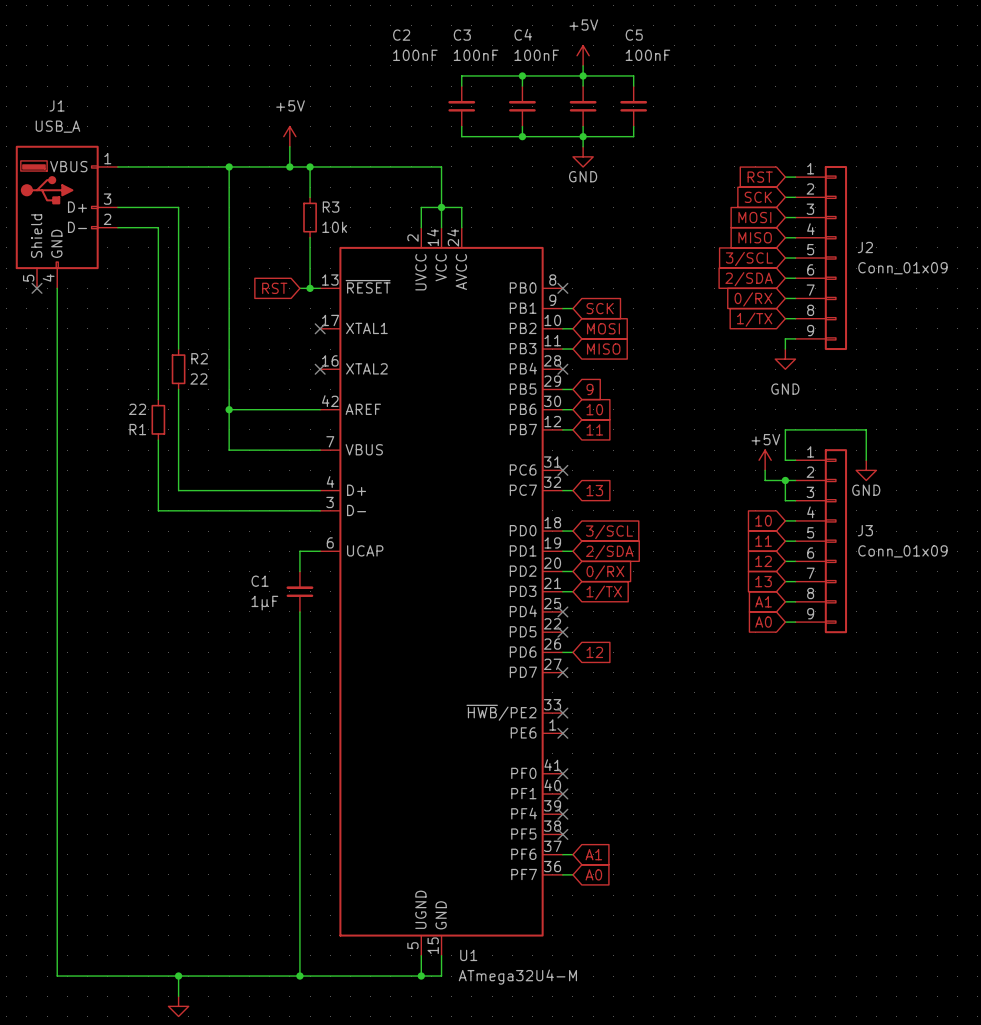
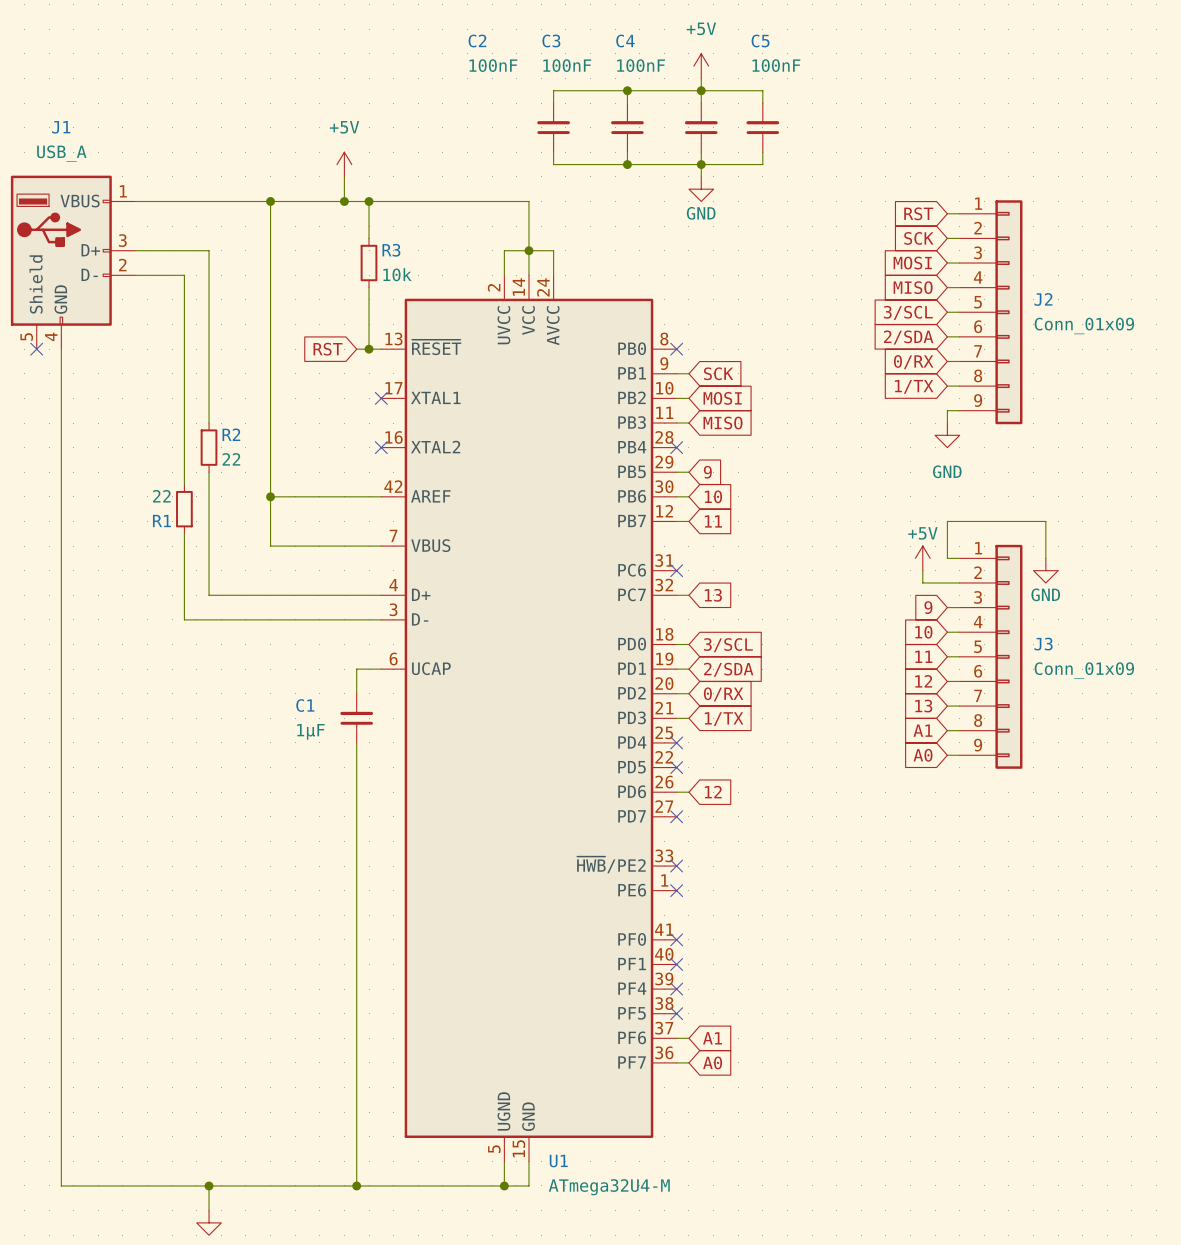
wire: (785, 480) (785, 500) -> none
junction: (785, 480) -> none
global label: none -> 9 (928, 607)

